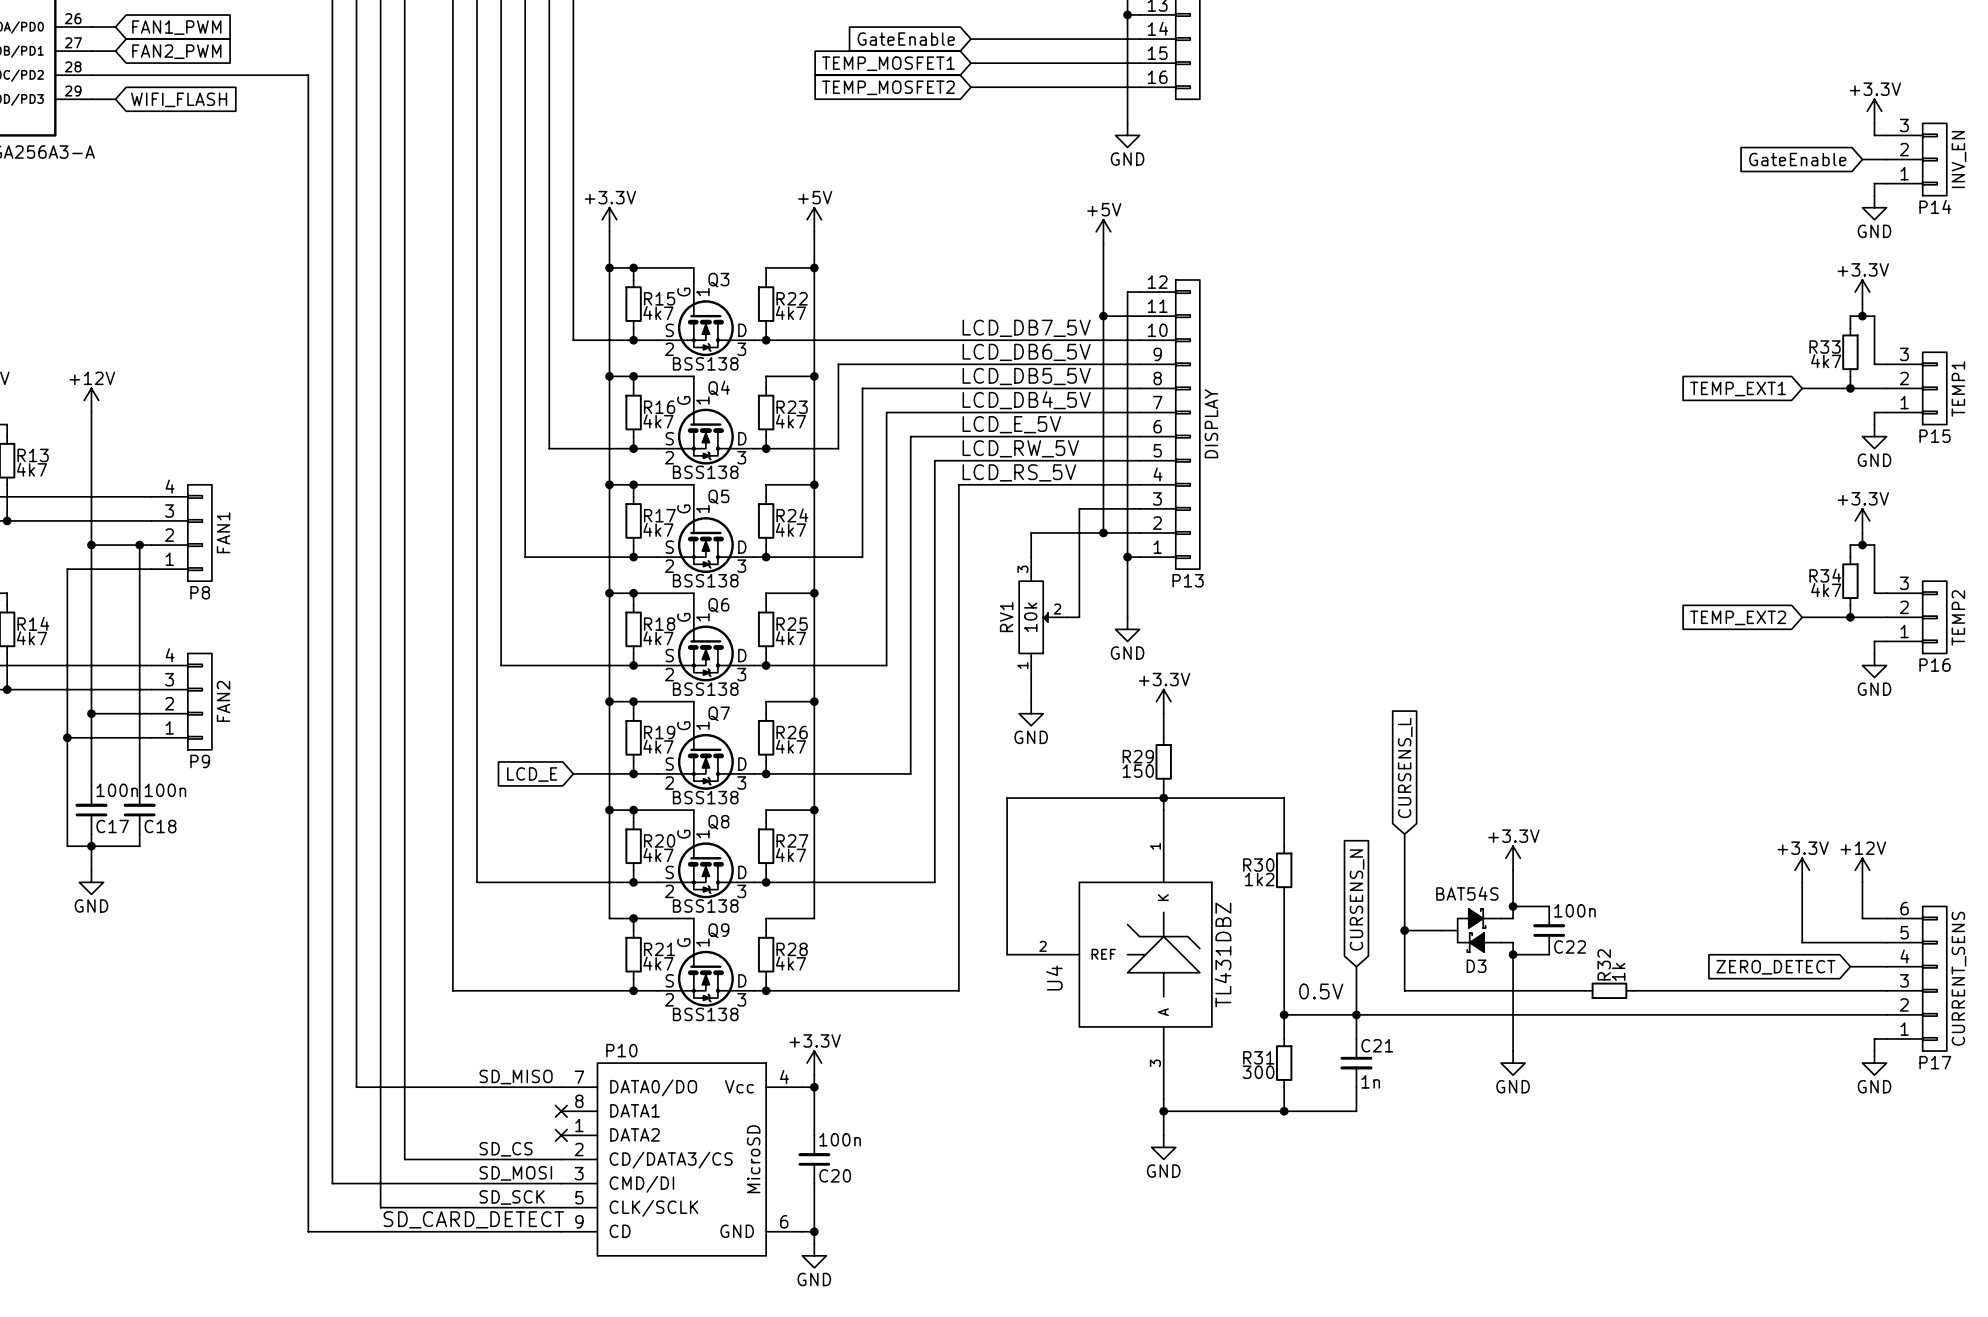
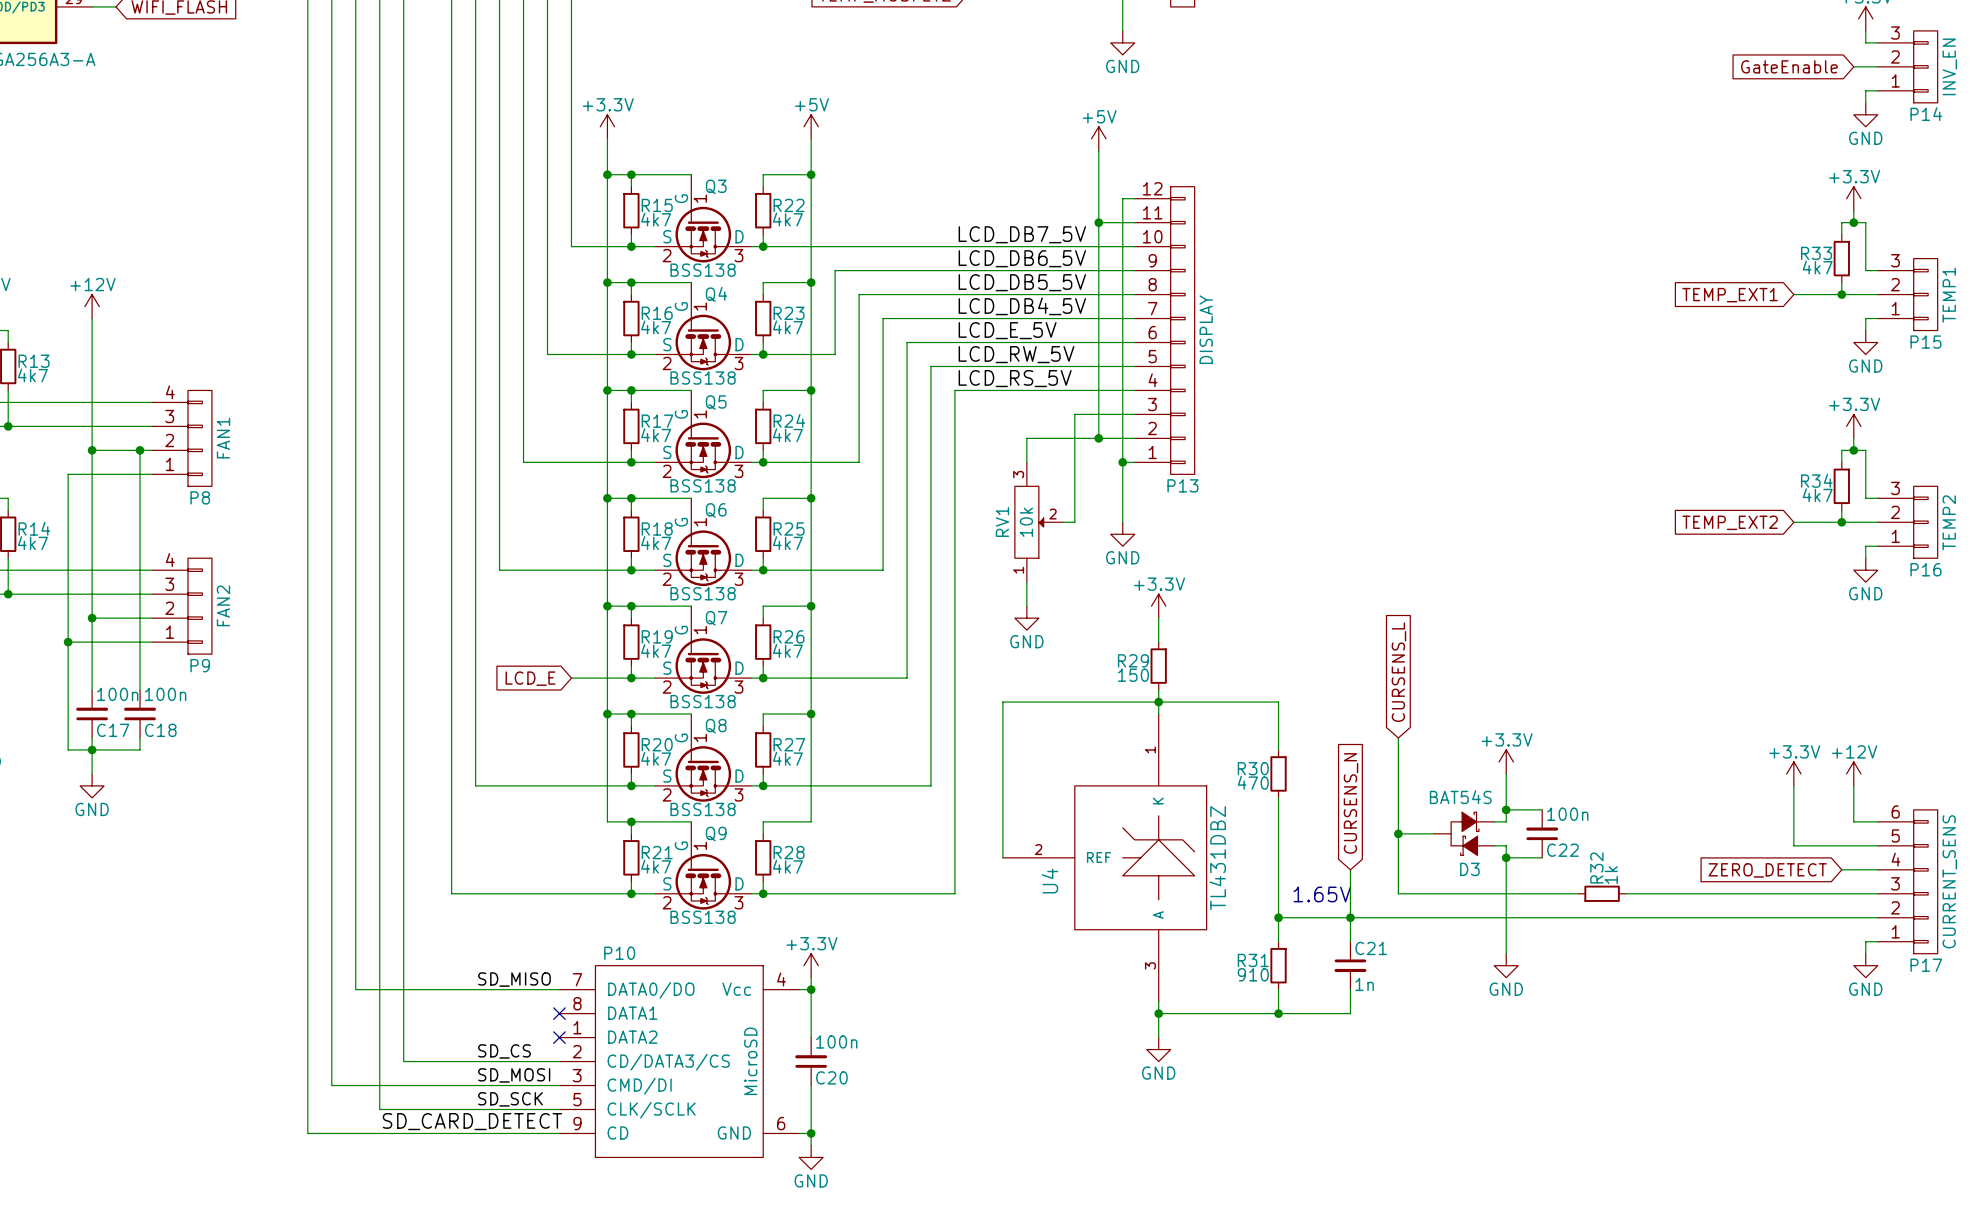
R30 value: 1k2 (1259, 879) -> 470 (1253, 782)
text: 0.5V (1321, 991) -> 1.65V (1322, 894)
R31 value: 300 (1258, 1072) -> 910 (1253, 974)

